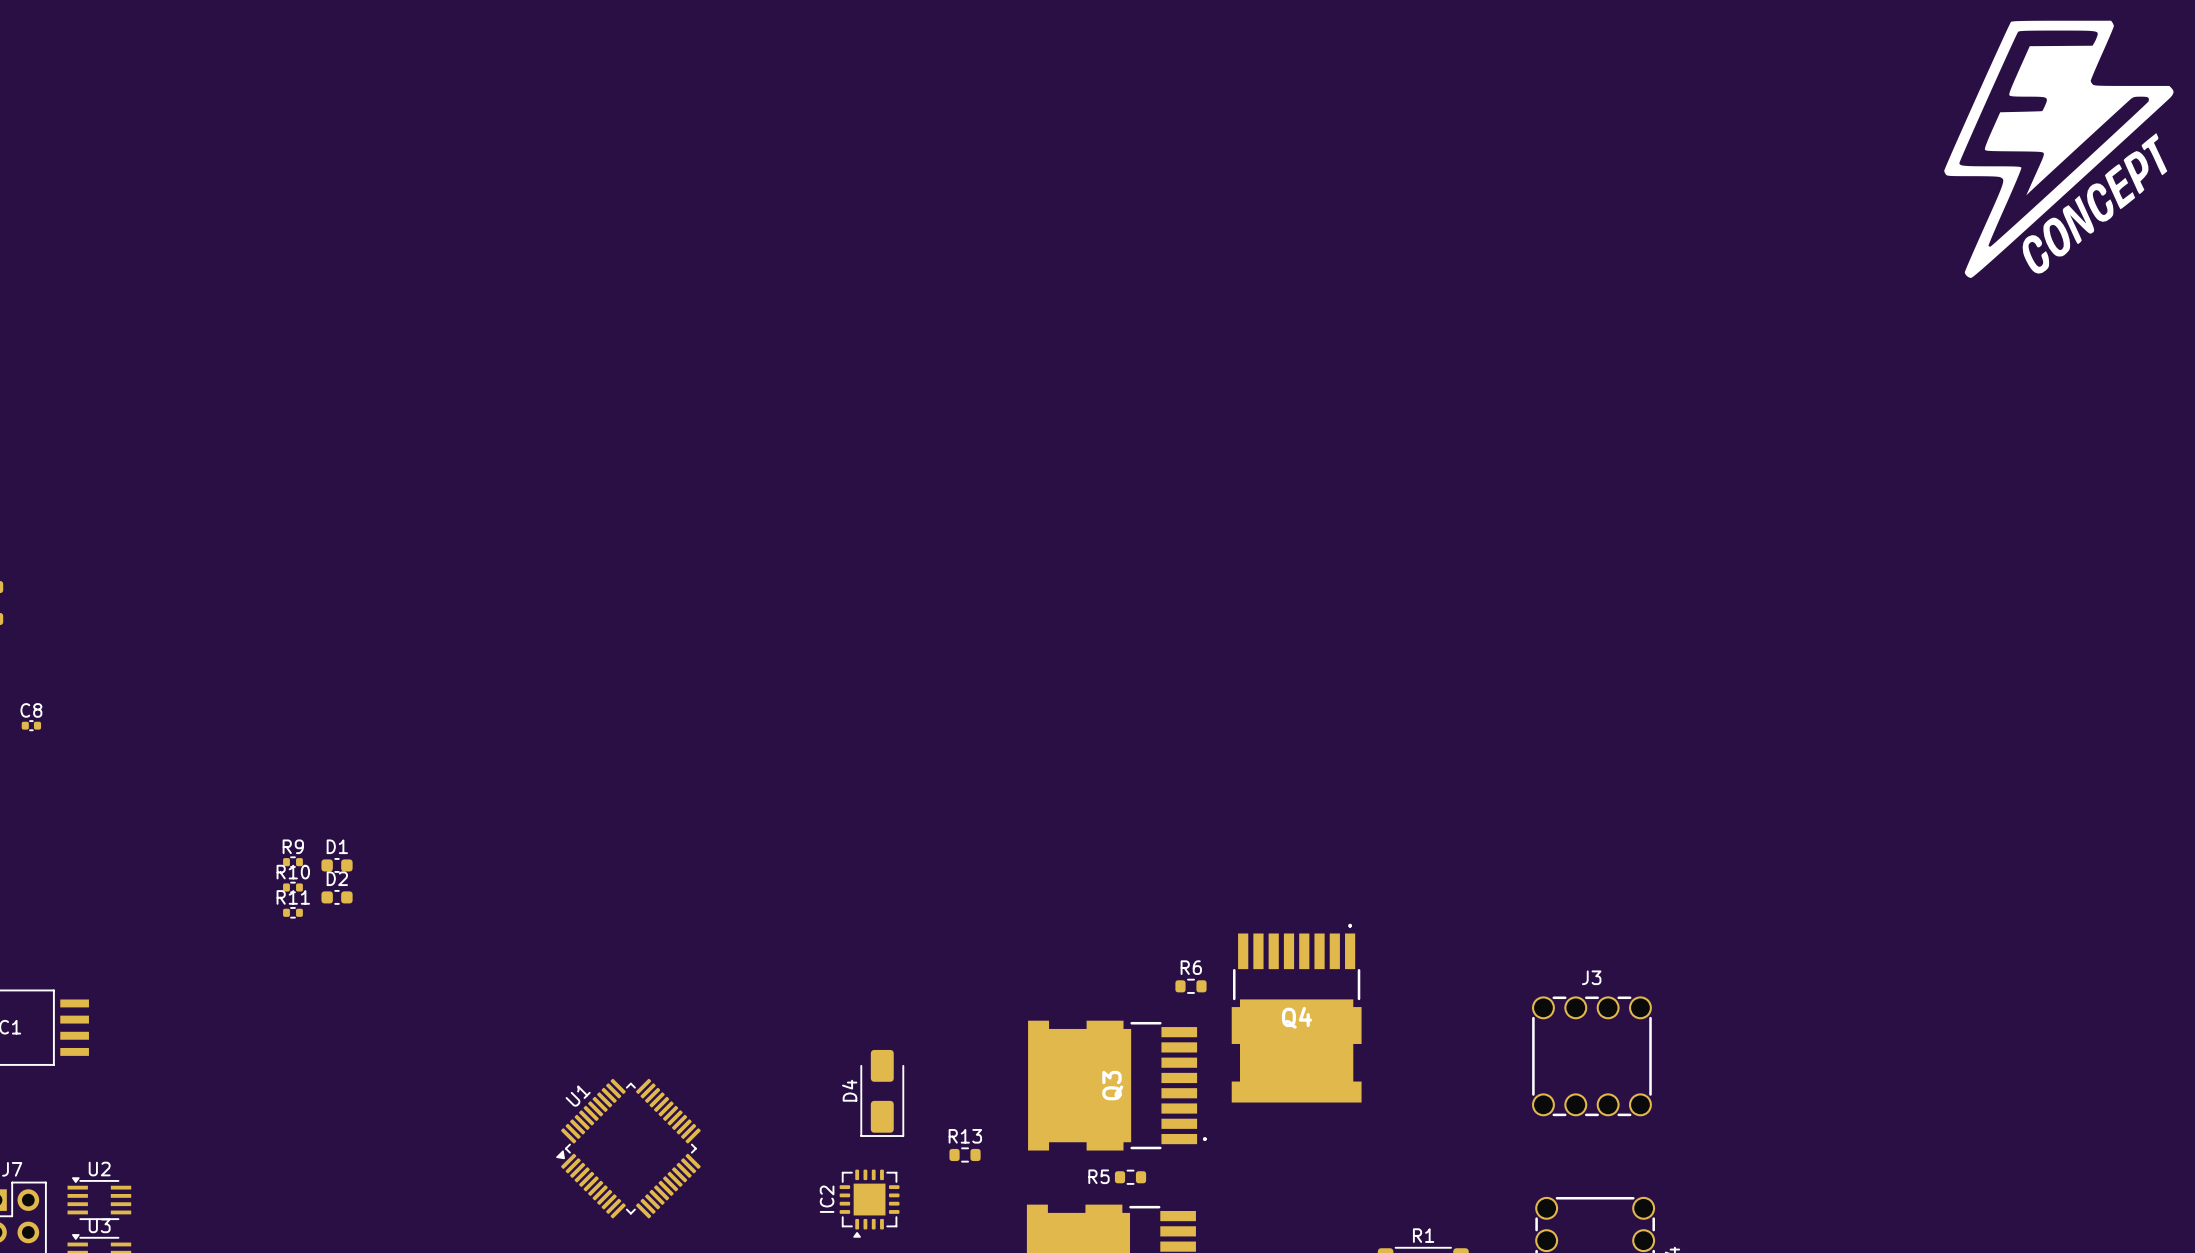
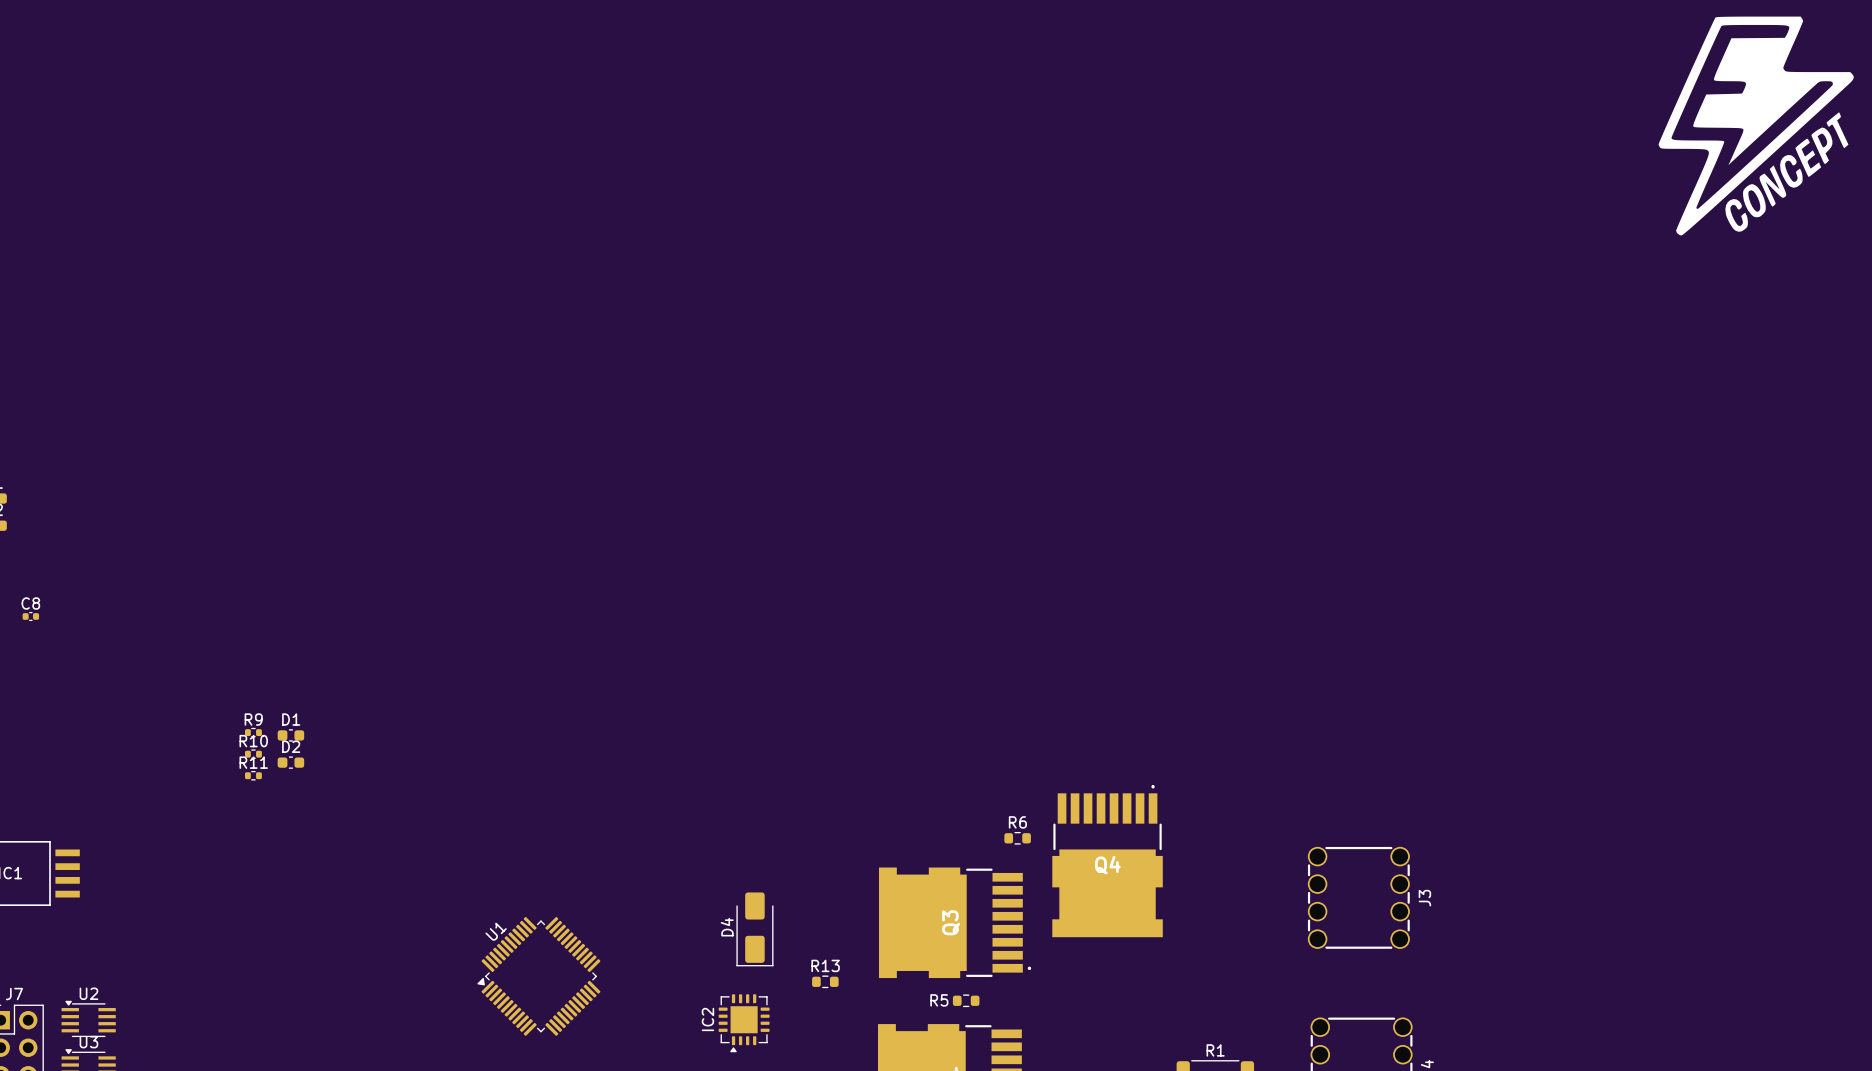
J3 rotation: 0° (1591, 1056) -> 90° clockwise (1358, 897)

